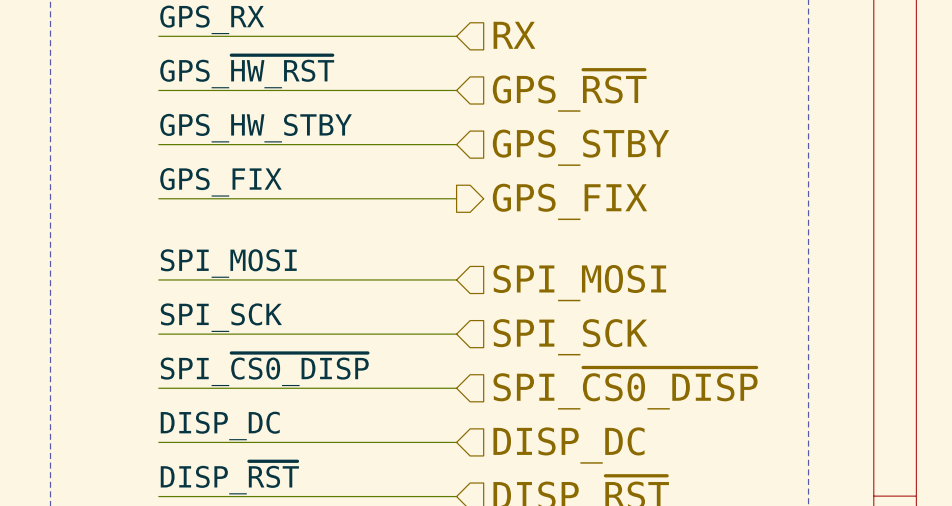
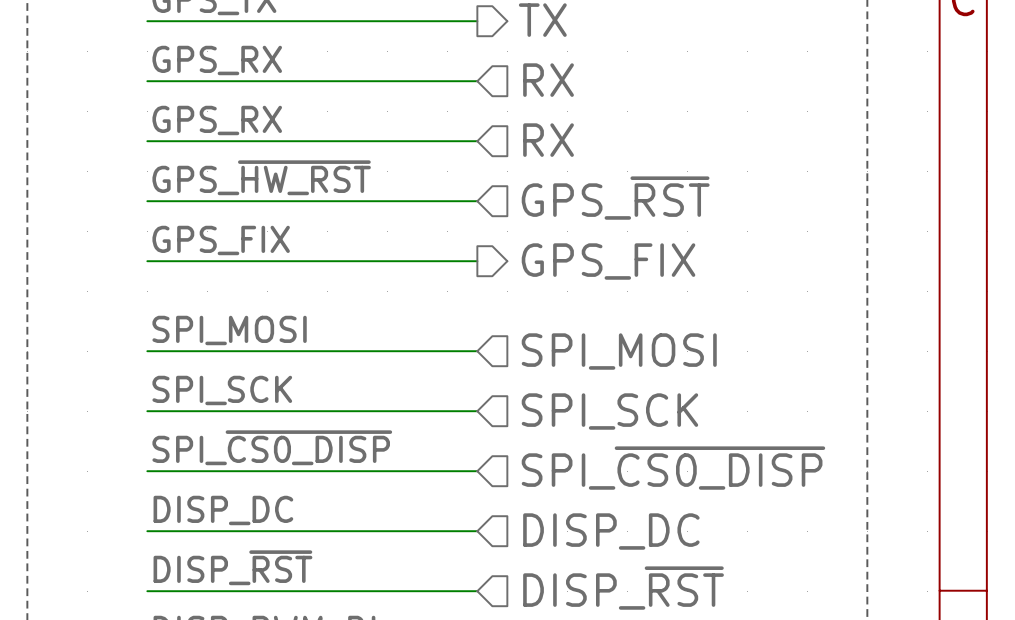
label: GPS_~{HW_RST} (247, 71) -> GPS_RX (217, 120)
hierarchical label: GPS_~{RST} (569, 90) -> RX (548, 140)
label: GPS_HW_STBY (256, 128) -> GPS_~{HW_RST} (261, 177)
hierarchical label: GPS_STBY (580, 147) -> GPS_~{RST} (615, 198)

